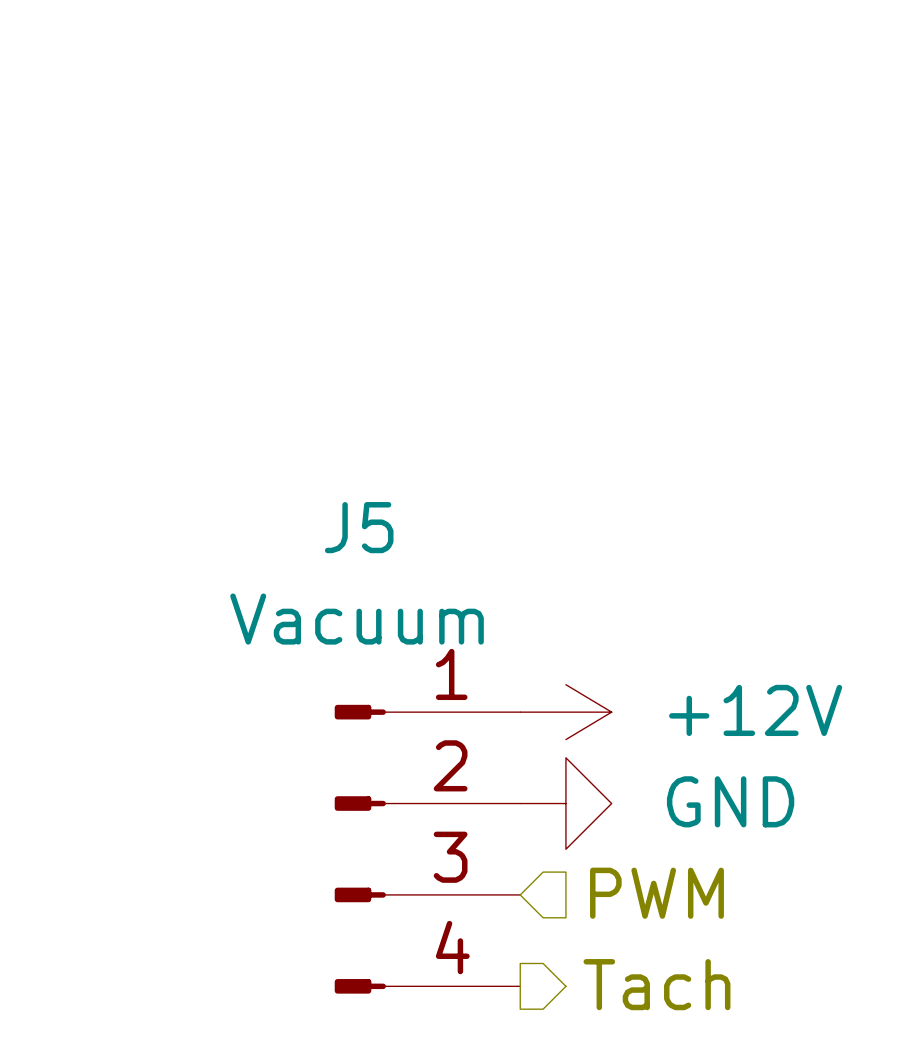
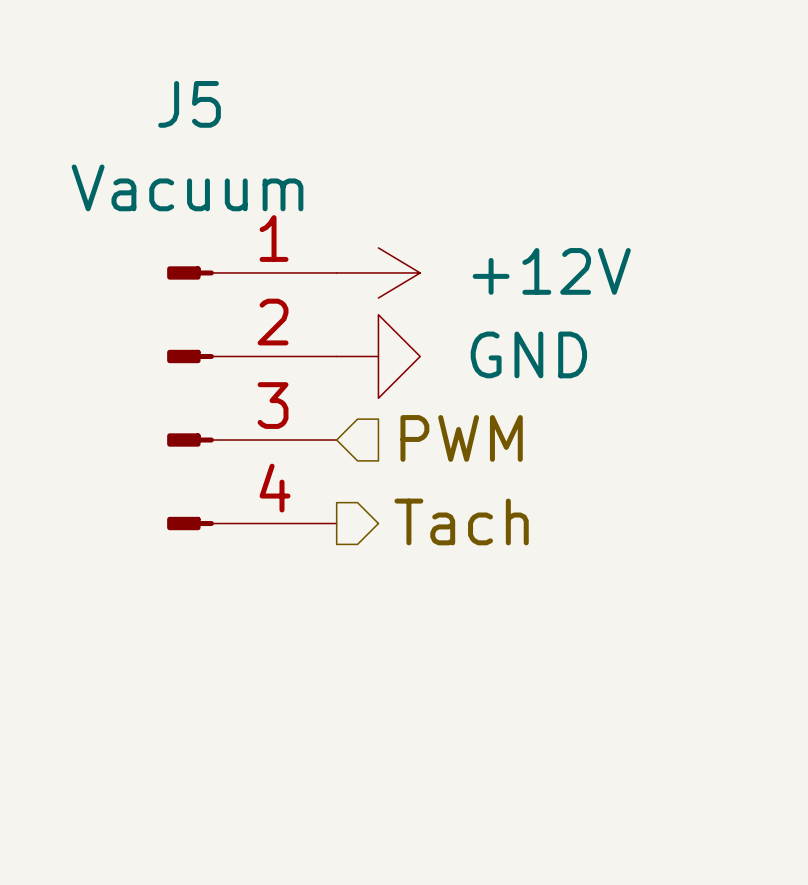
power symbol position: +12V (565, 712) -> +12V (378, 272)
power symbol position: GND (565, 803) -> GND (378, 356)
J5 position: (427, 849) -> (251, 398)
hierarchical label position: PWM (656, 893) -> PWM (461, 438)
hierarchical label position: Tach (656, 984) -> Tach (461, 521)

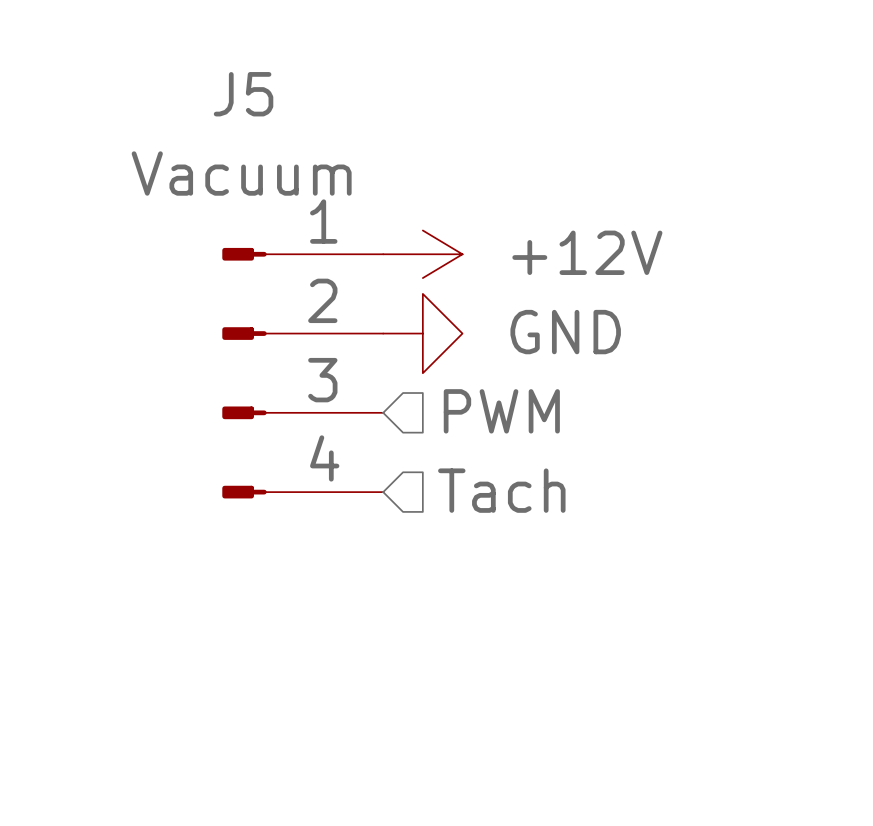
hierarchical label shape: output (461, 521) -> input (501, 490)

